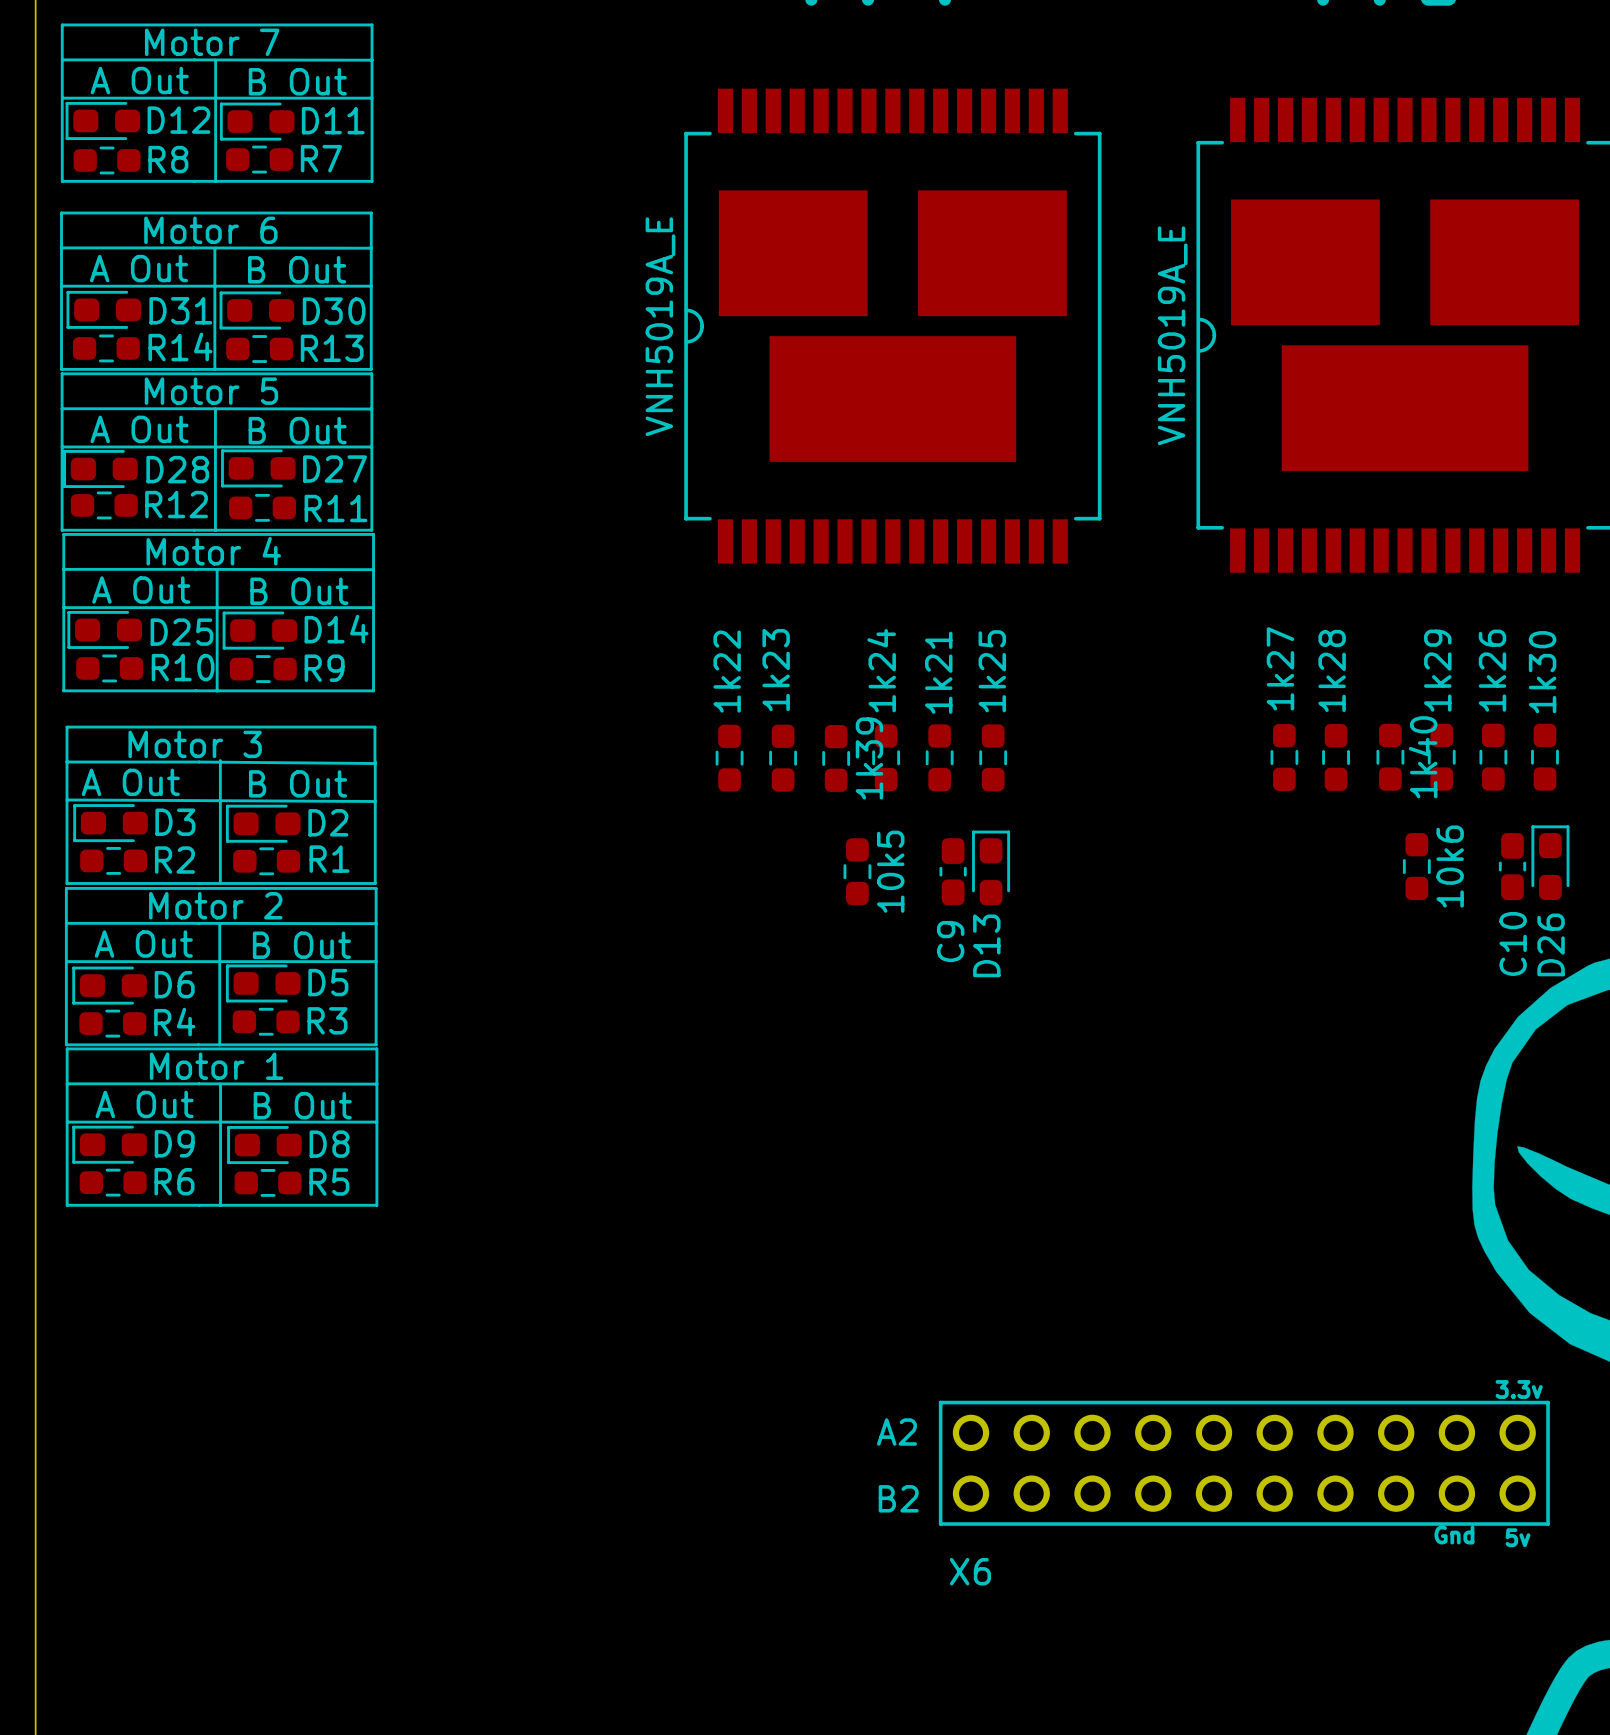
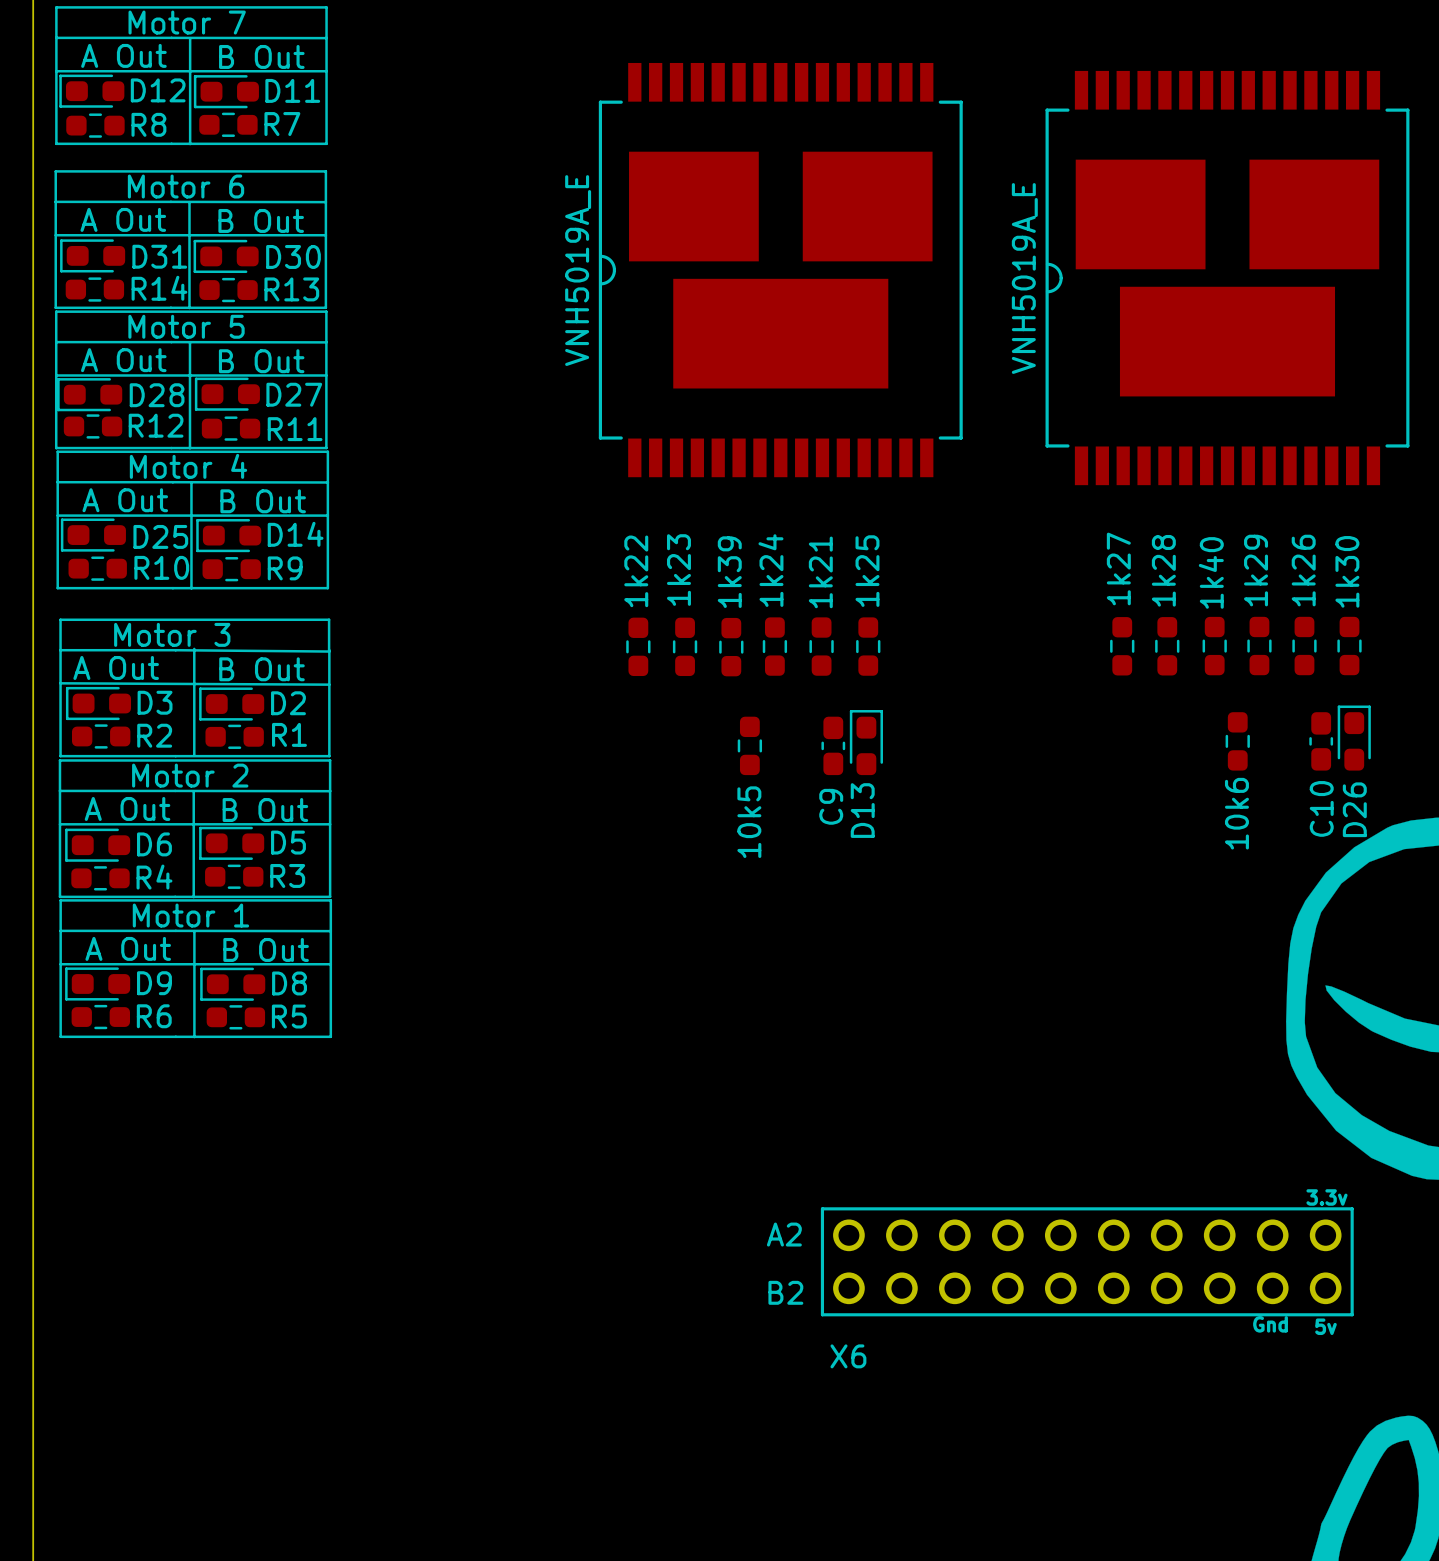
1k40 name position: 1k40 (1423, 757) -> 1k40 (1211, 572)
1k39 name position: 1k39 (869, 758) -> 1k39 (729, 572)
10k6 name position: 10k6 (1450, 866) -> 10k6 (1236, 813)
10k5 name position: 10k5 (890, 871) -> 10k5 (749, 822)

